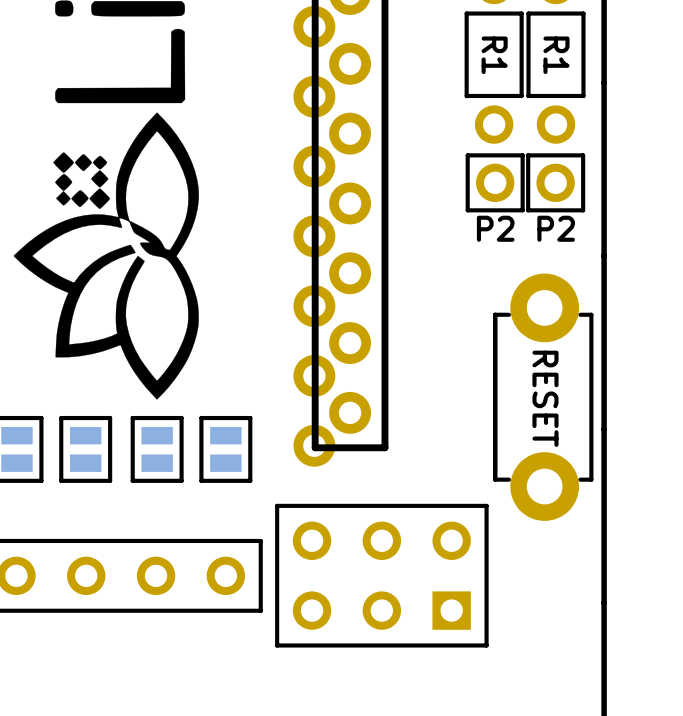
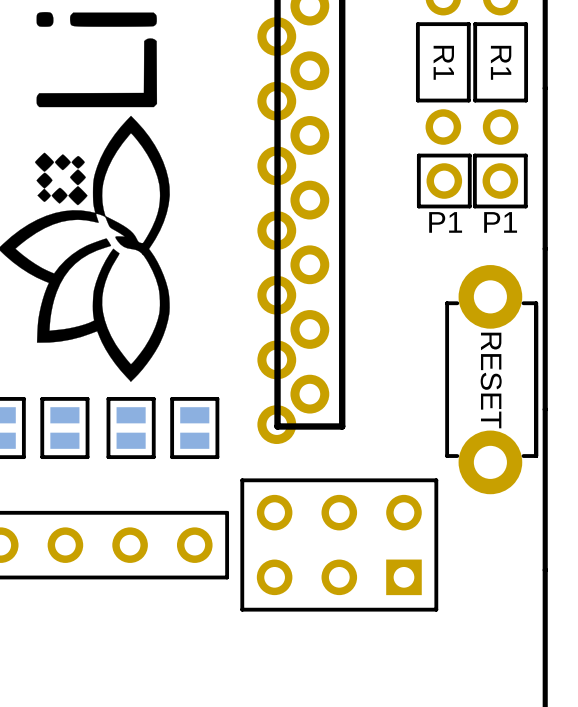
part text: none -> P1 (445, 222)
part text: none -> P1 (500, 222)
part text: P2 (495, 228) -> none
part text: P2 (556, 228) -> none
part rotation: 0° (543, 397) -> 180° (491, 379)

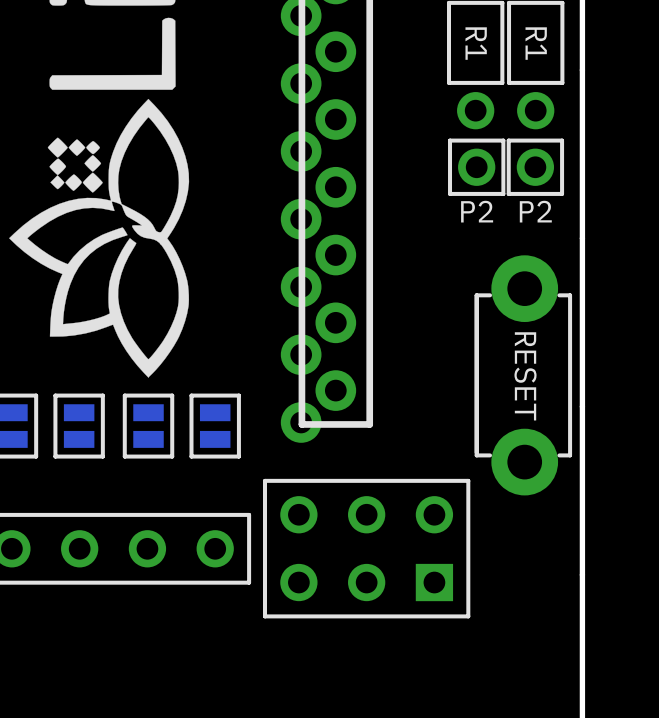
part text: P1 (445, 222) -> none
part text: P1 (500, 222) -> none
part text: none -> P2 (477, 211)
part text: none -> P2 (535, 211)
part rotation: 0° (491, 379) -> 180° (523, 375)

